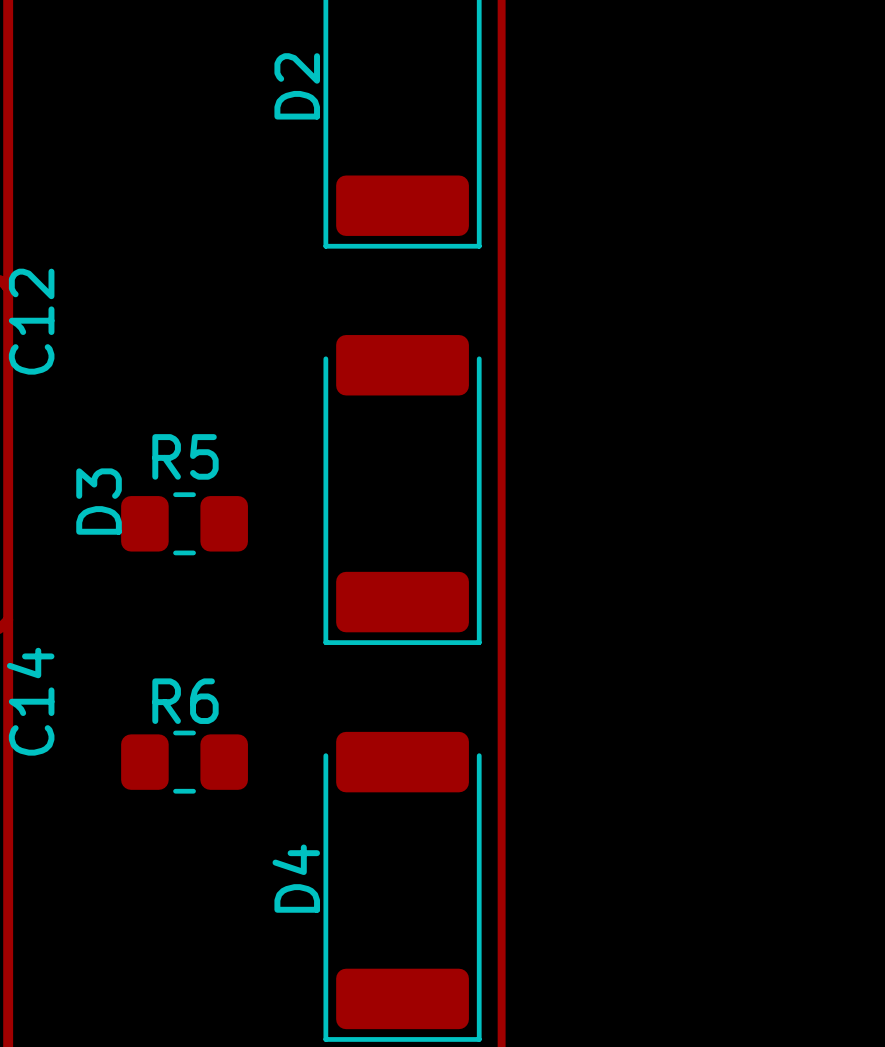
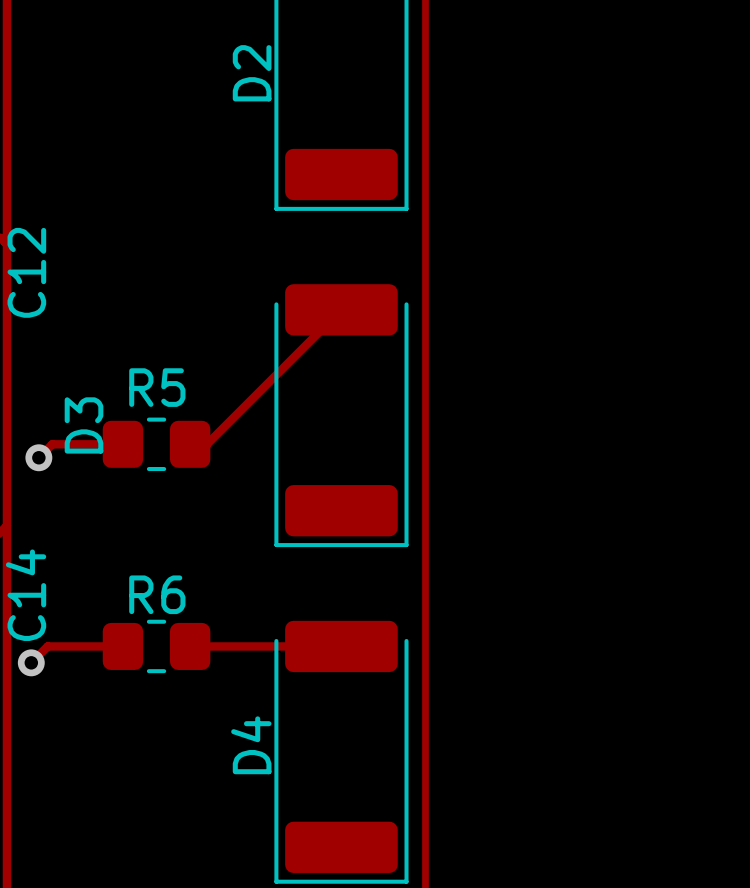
track: none -> (341, 309) (206, 444) (190, 444)
track: none -> (122, 444) (52, 444) (38, 457)
via: none -> (38, 457)
track: none -> (122, 646) (47, 646) (31, 662)
track: none -> (190, 646) (341, 646)
via: none -> (31, 662)

